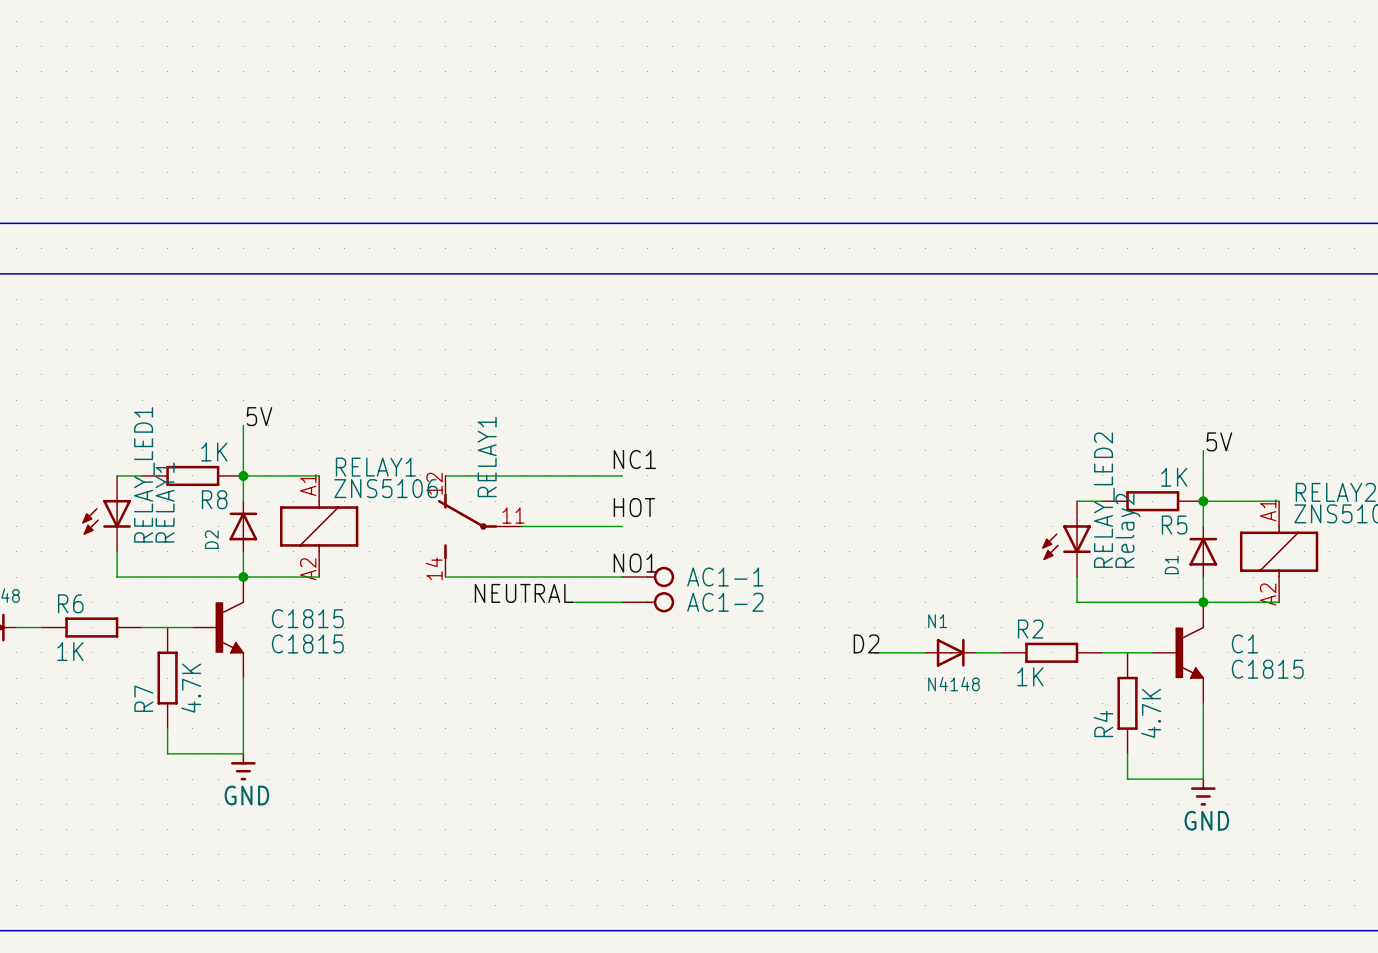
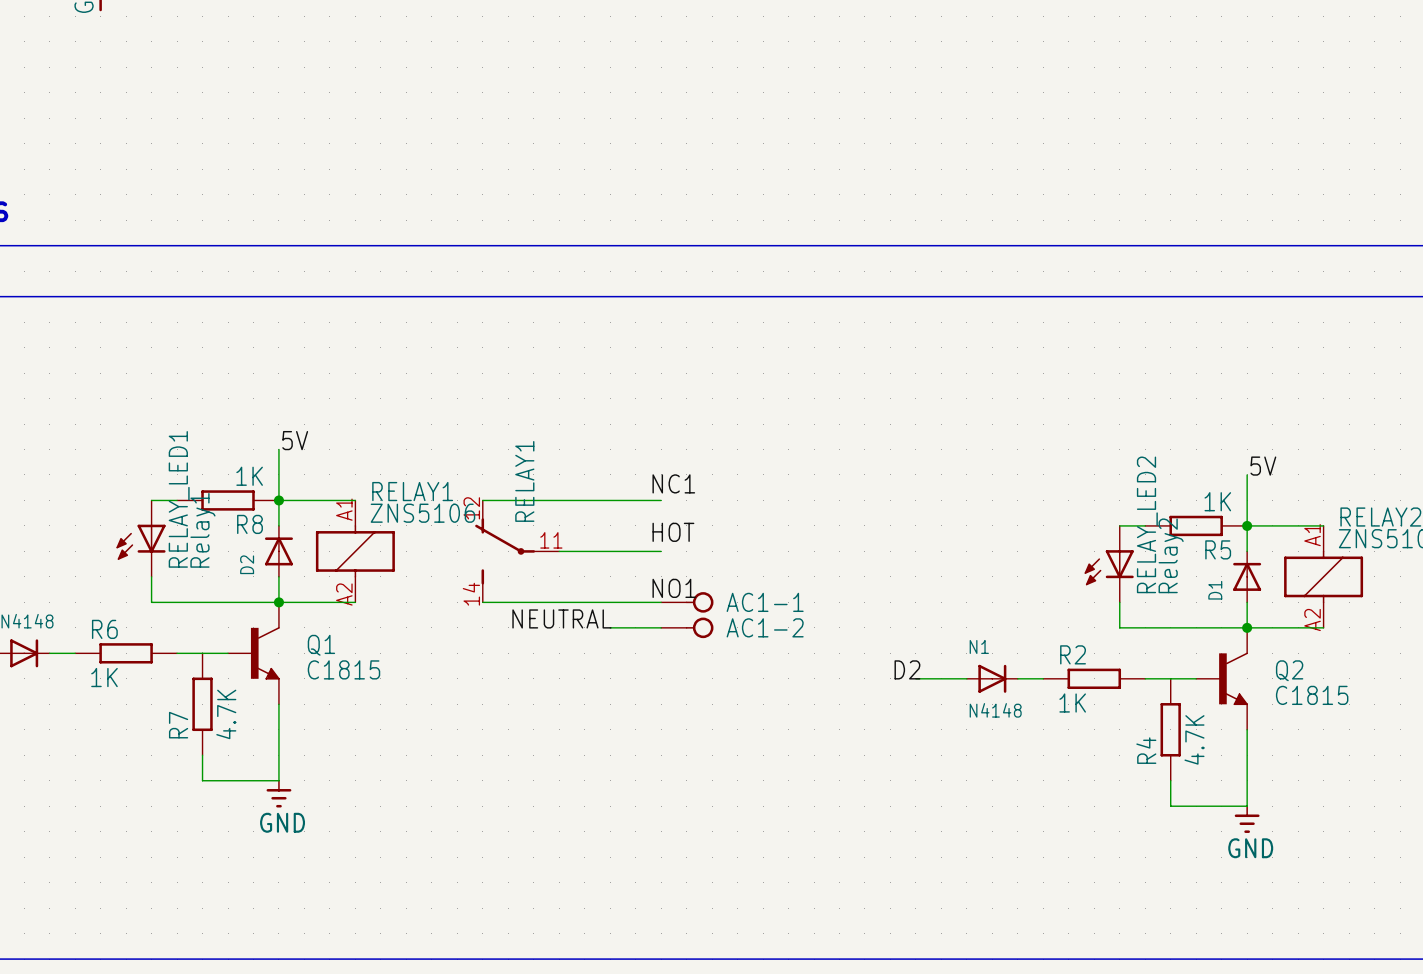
RELAY_LED1 value: RELAY1 (165, 502) -> Relay1 (202, 530)
C1815 name: C1815 (307, 618) -> Q1 (321, 645)
C1 name: C1 (1245, 643) -> Q2 (1289, 670)

